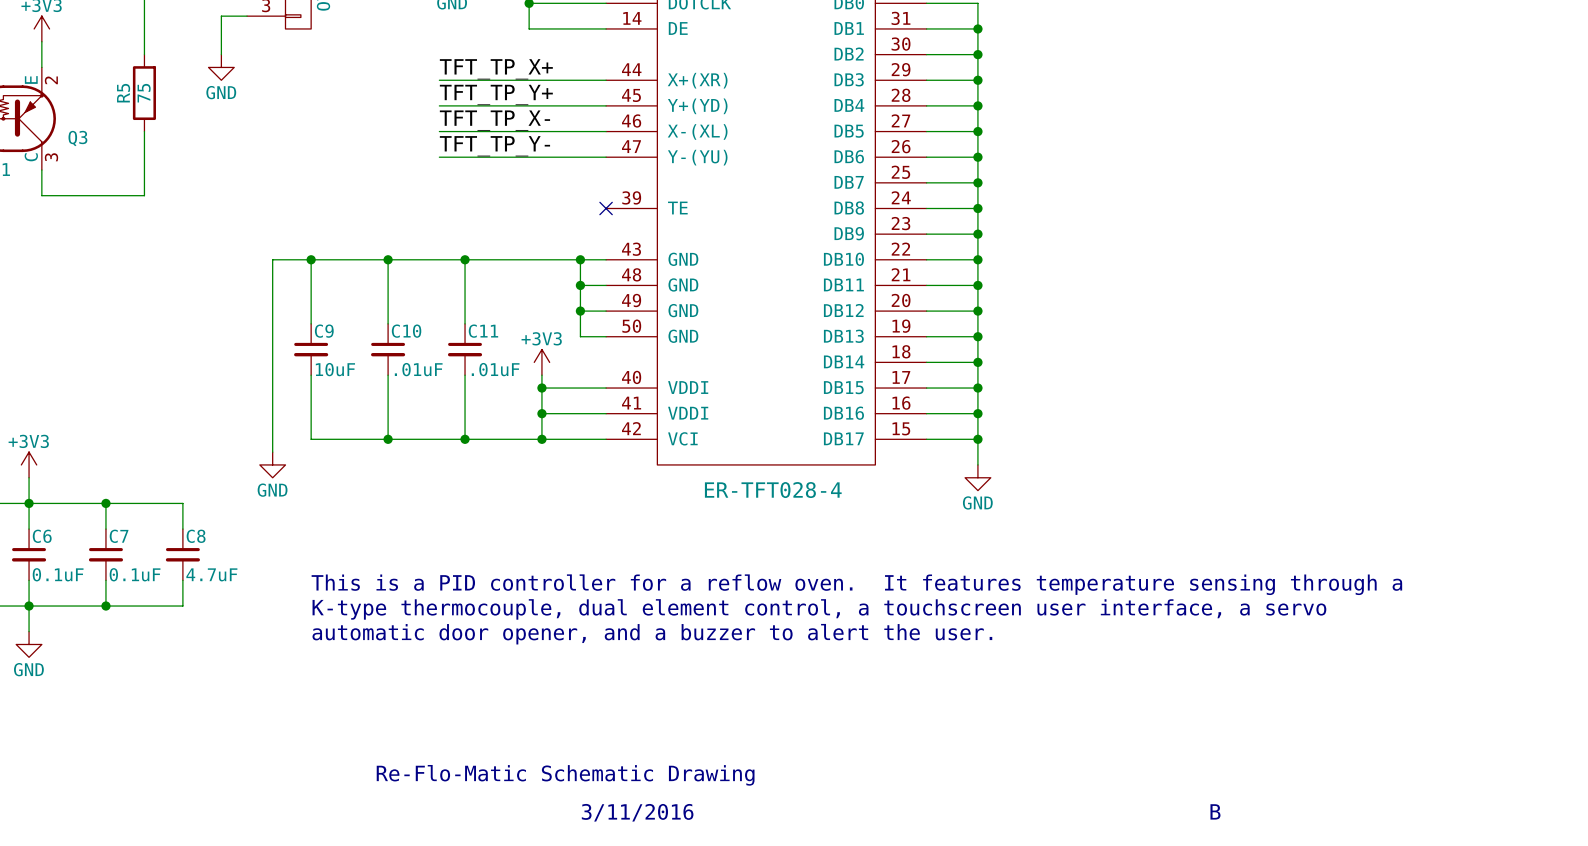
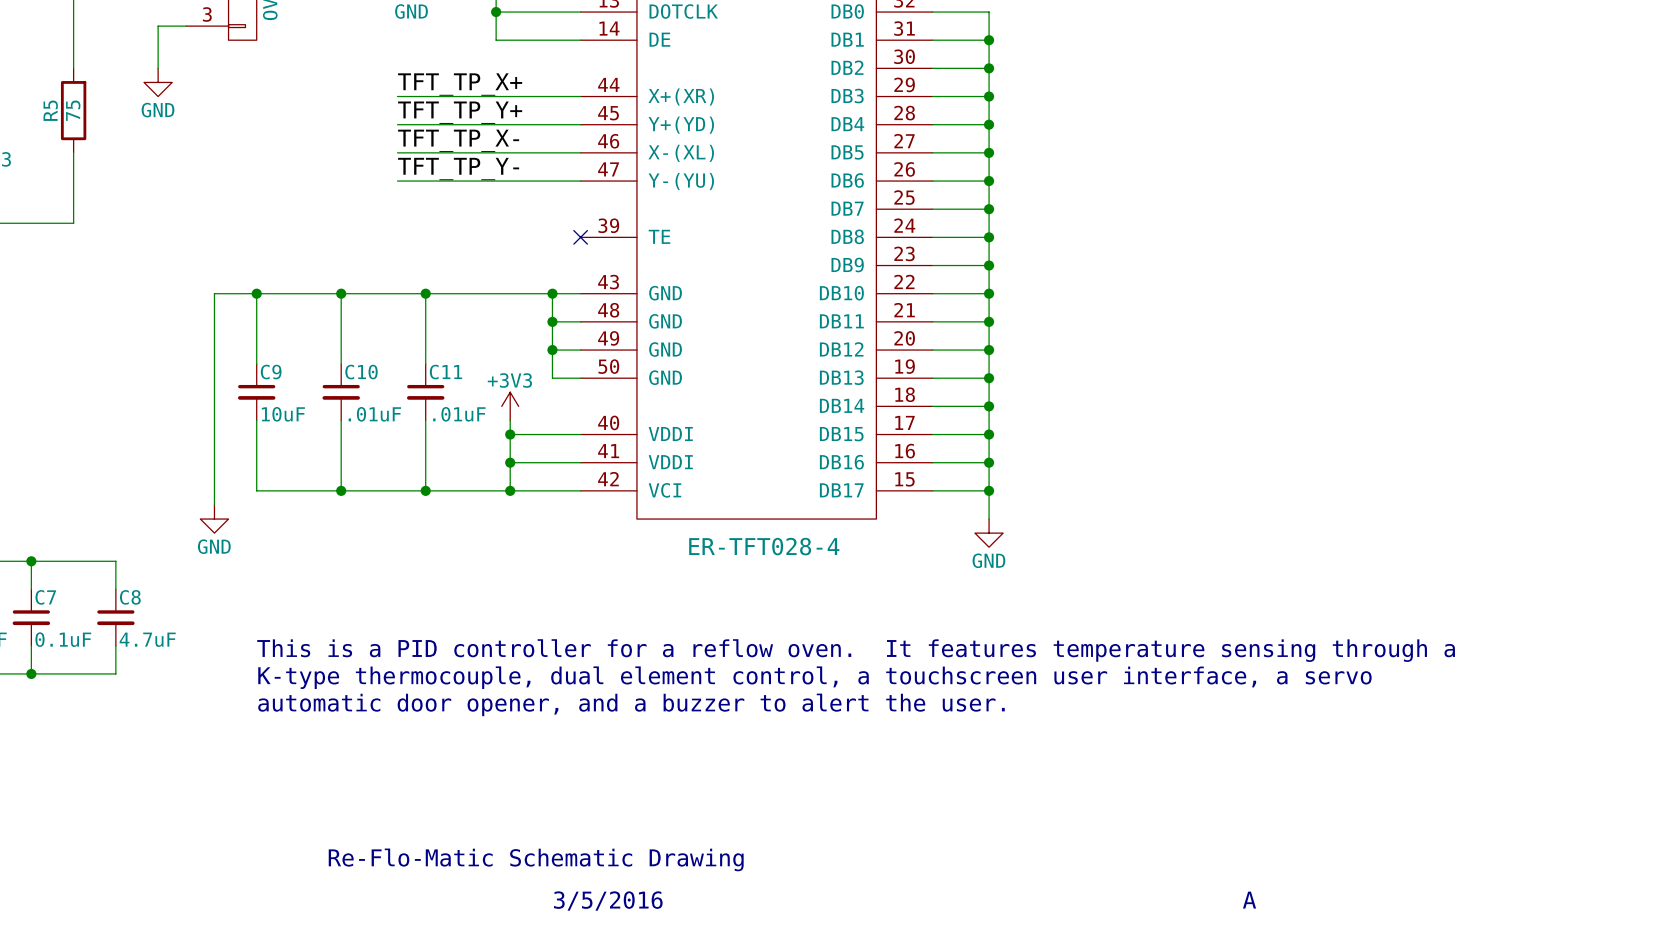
text: B (1215, 811) -> A (1249, 900)
text: 3/11/2016 (637, 812) -> 3/5/2016 (608, 901)

